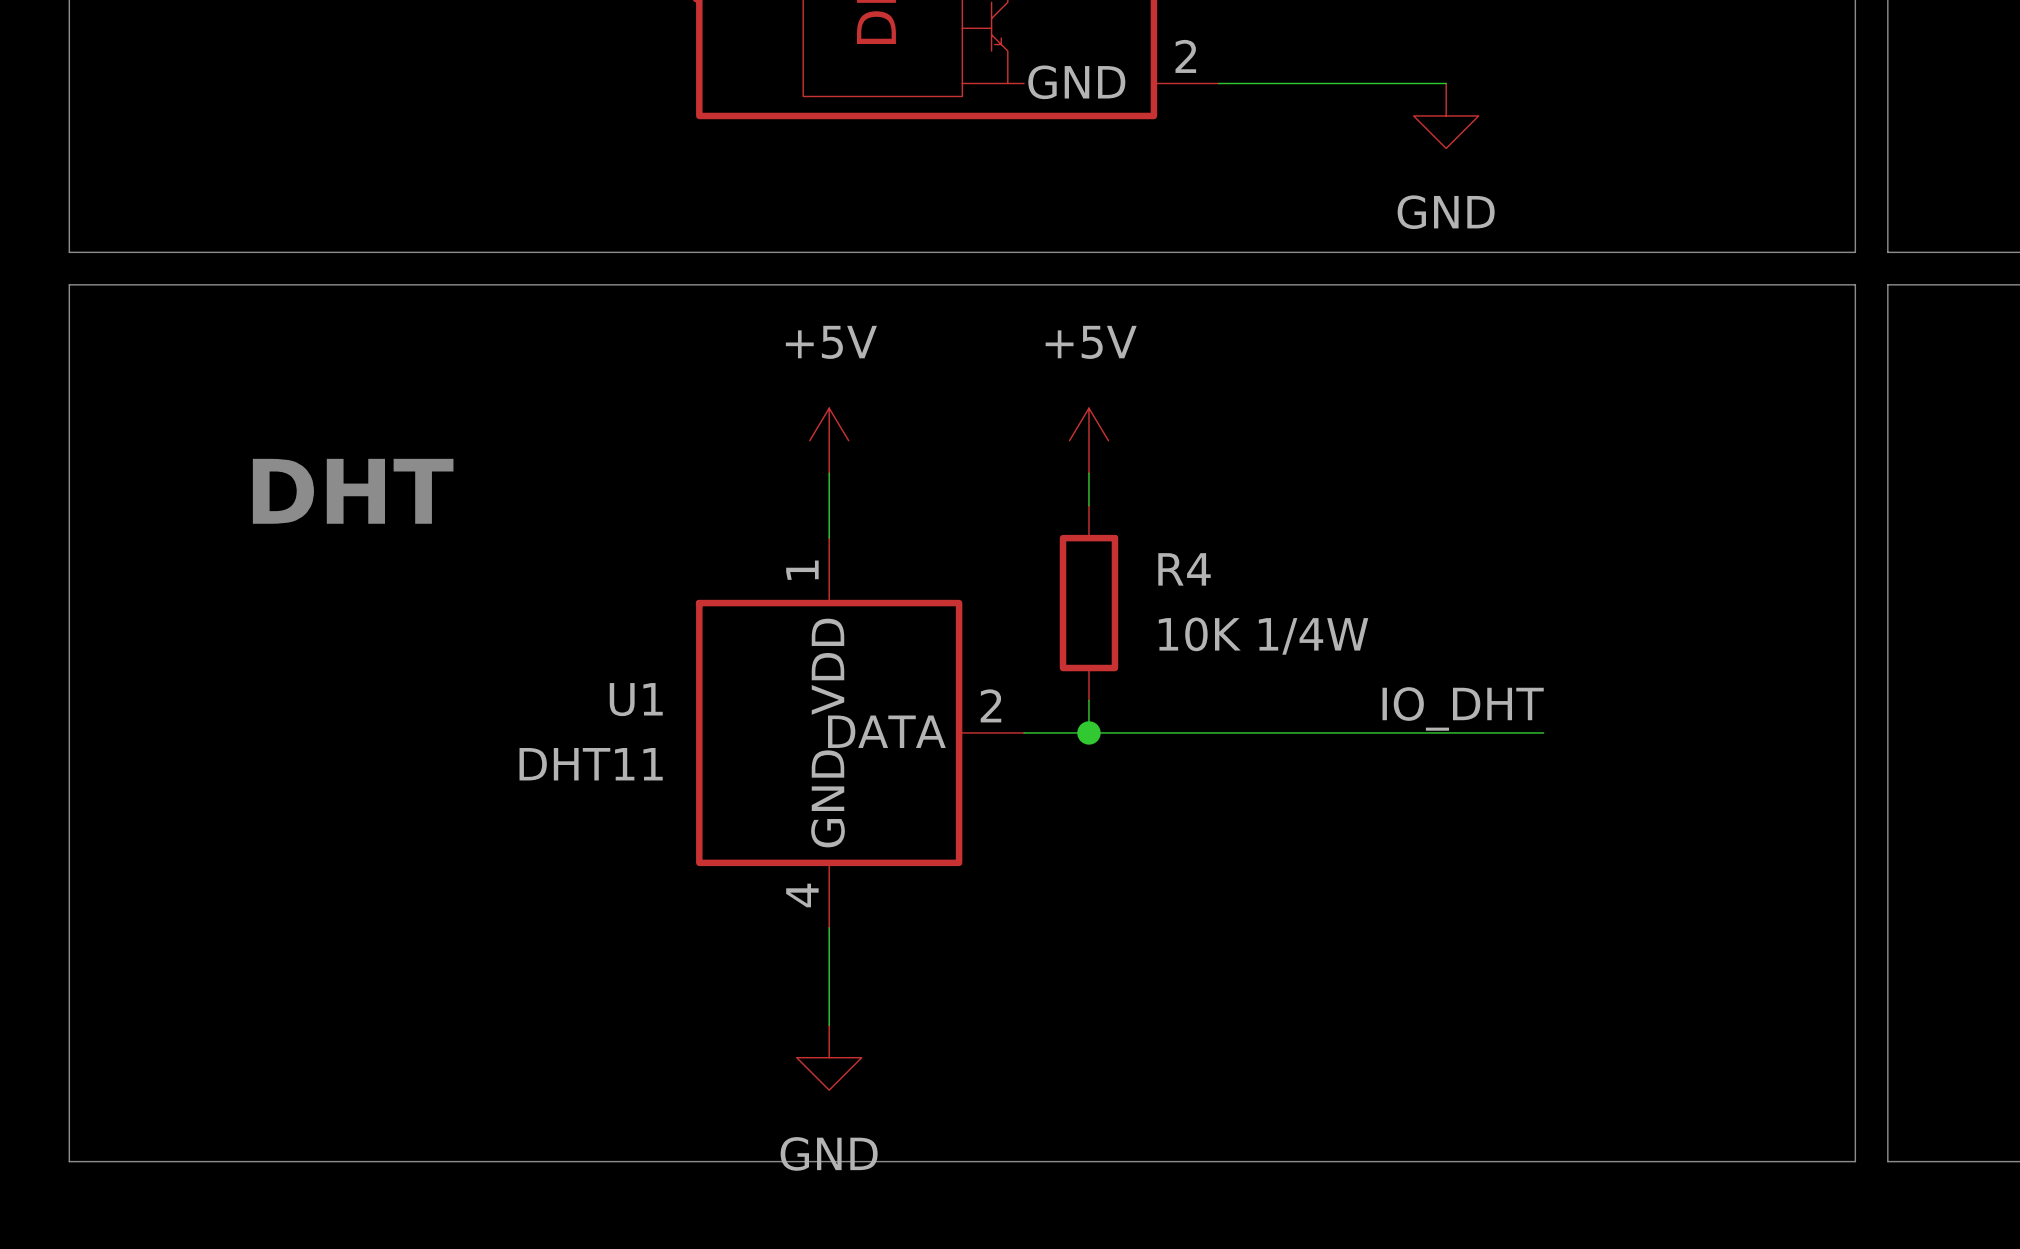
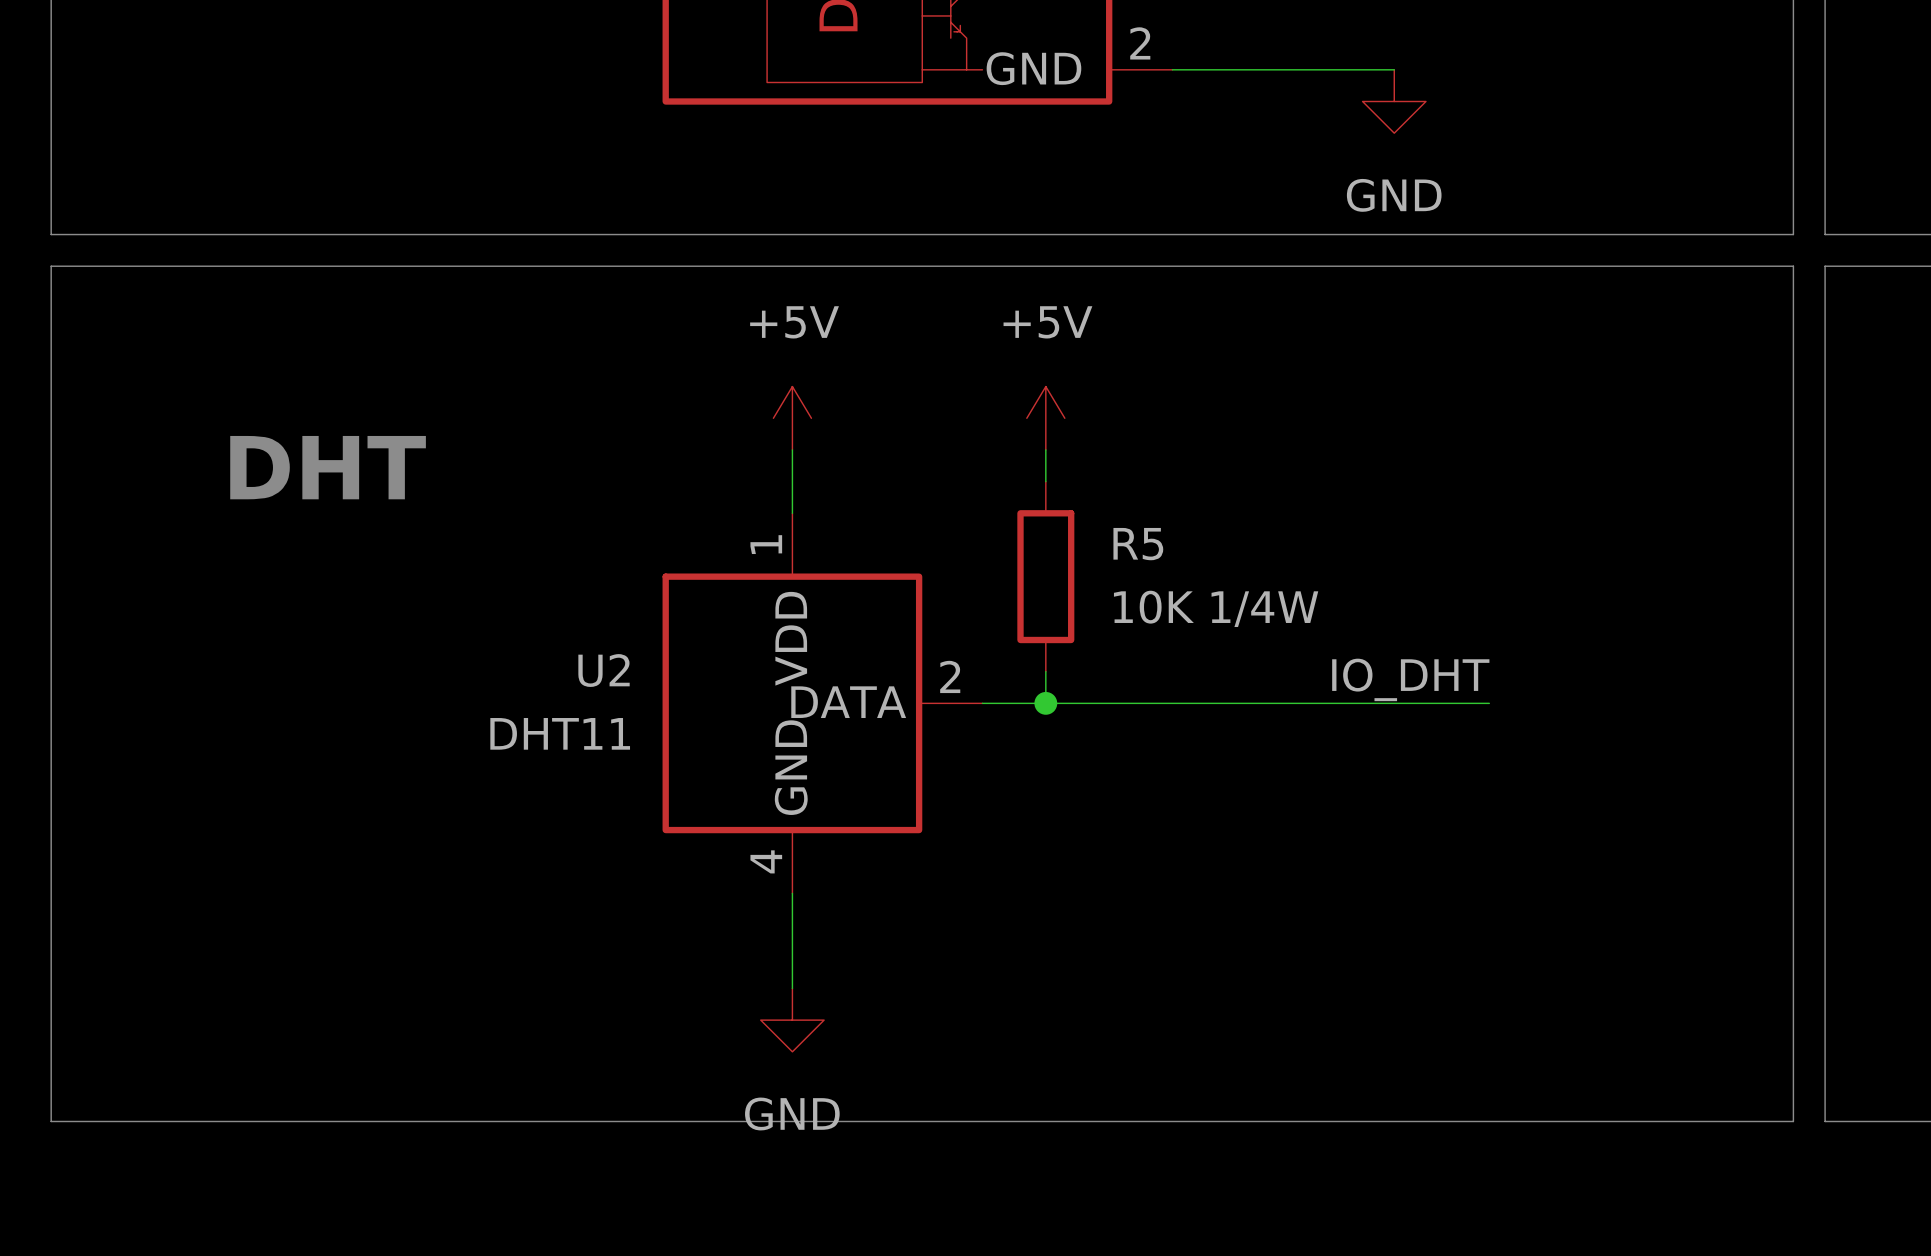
R4 name: R4 (1184, 569) -> R5 (1138, 544)
U1 name: U1 (636, 699) -> U2 (604, 670)

